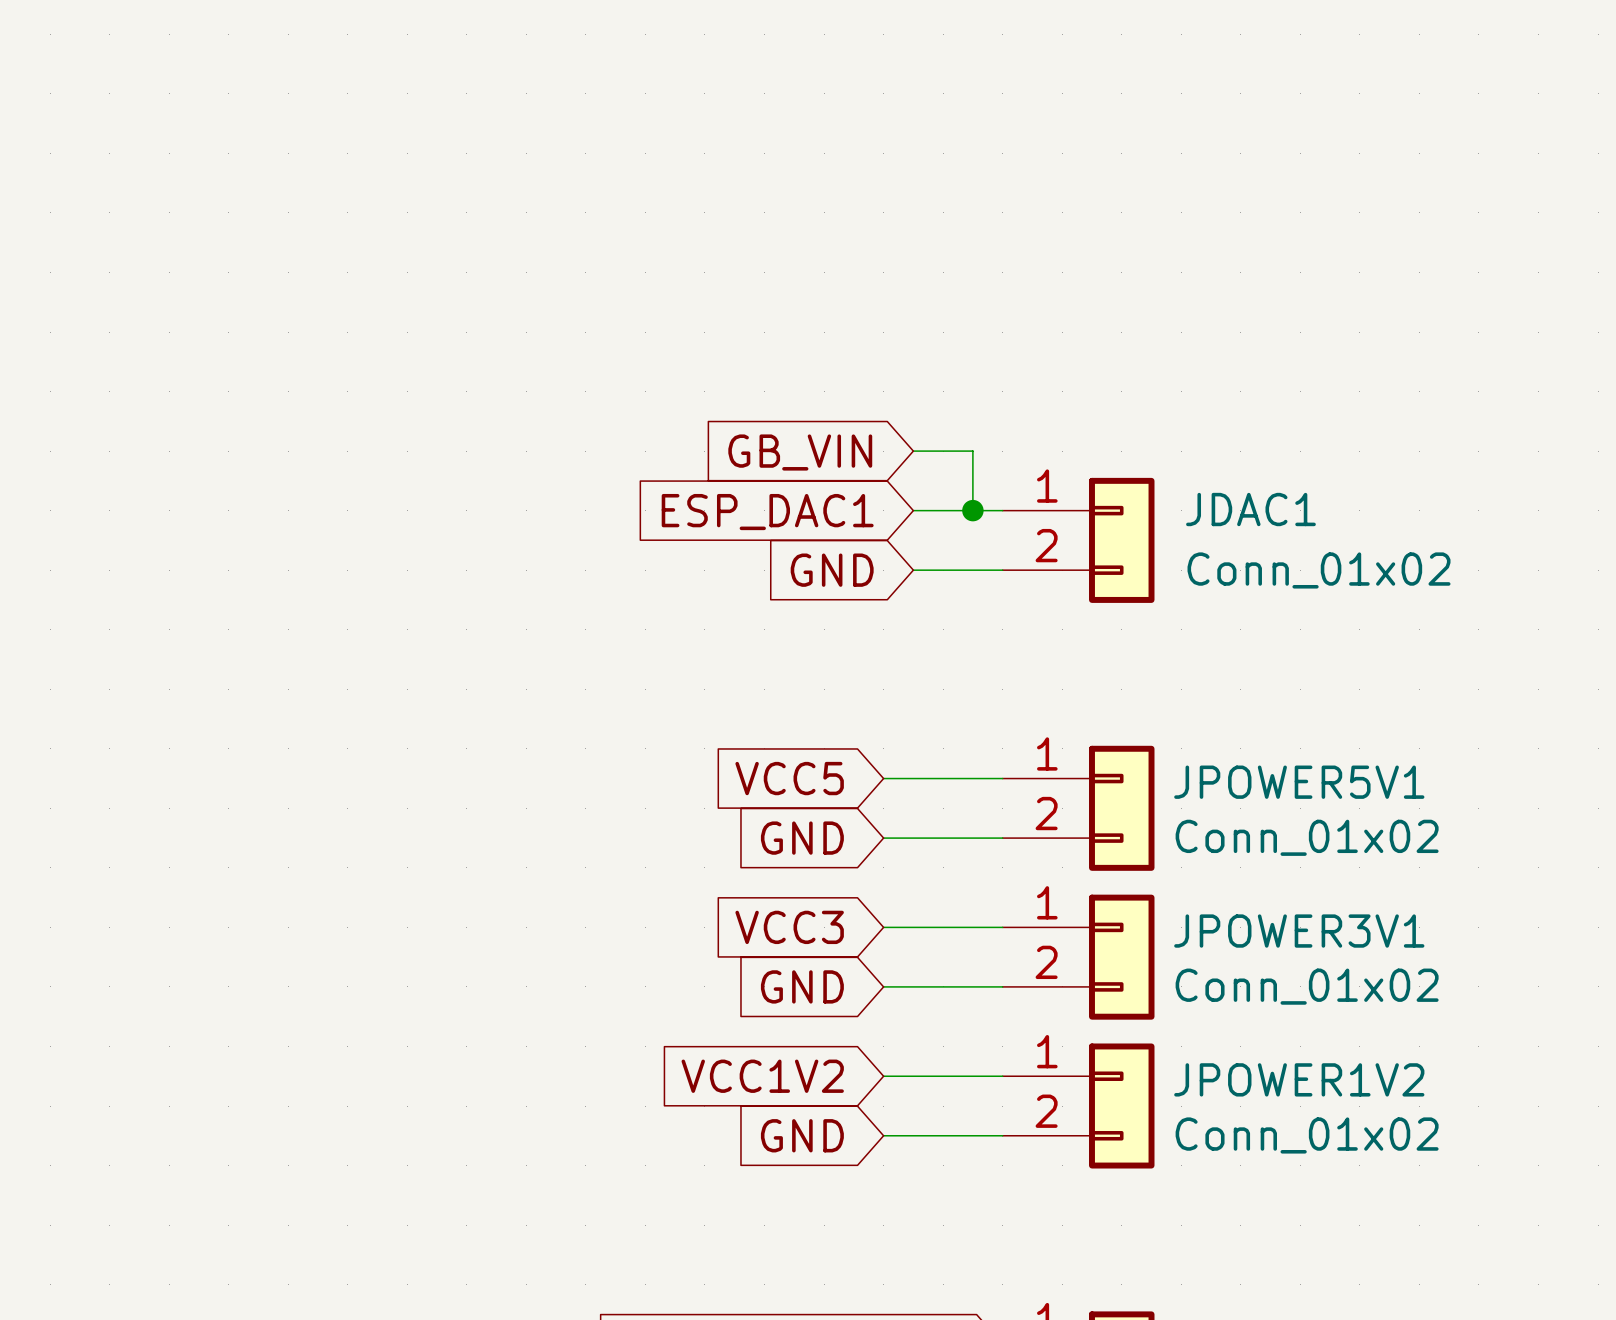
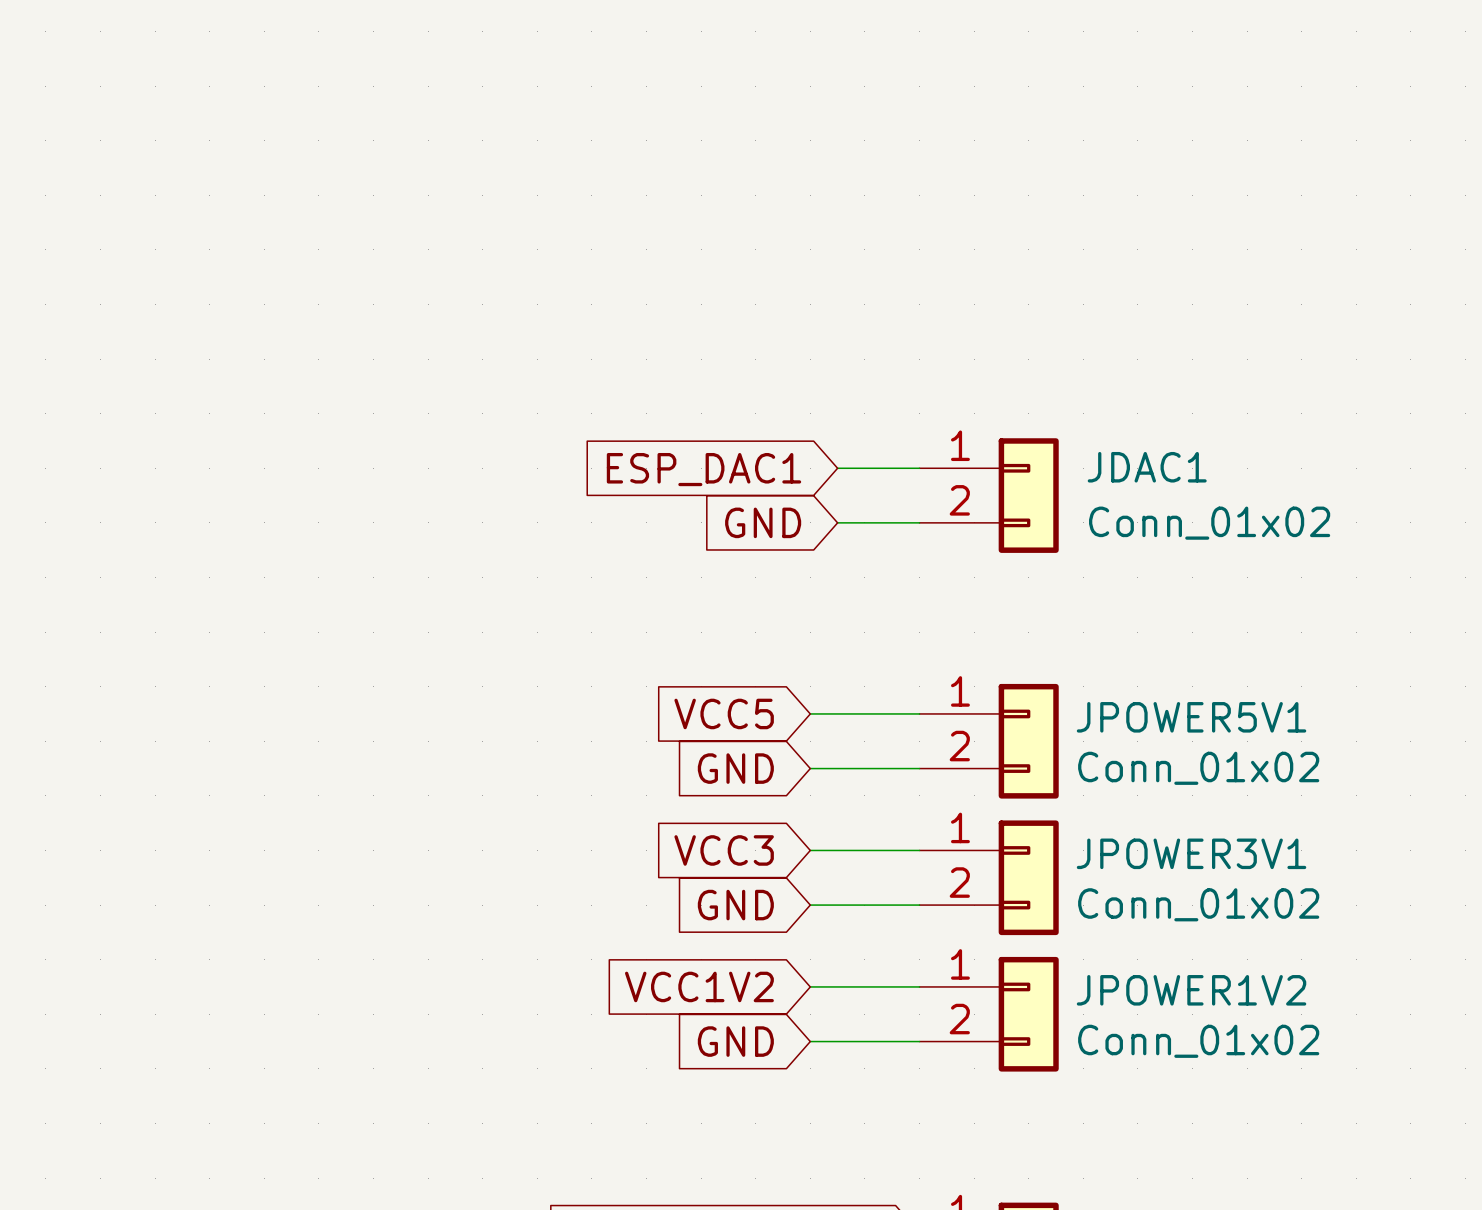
wire: (913, 451) (972, 451) (972, 510) -> none
global label: GB_VIN (800, 452) -> none
junction: (972, 510) -> none

